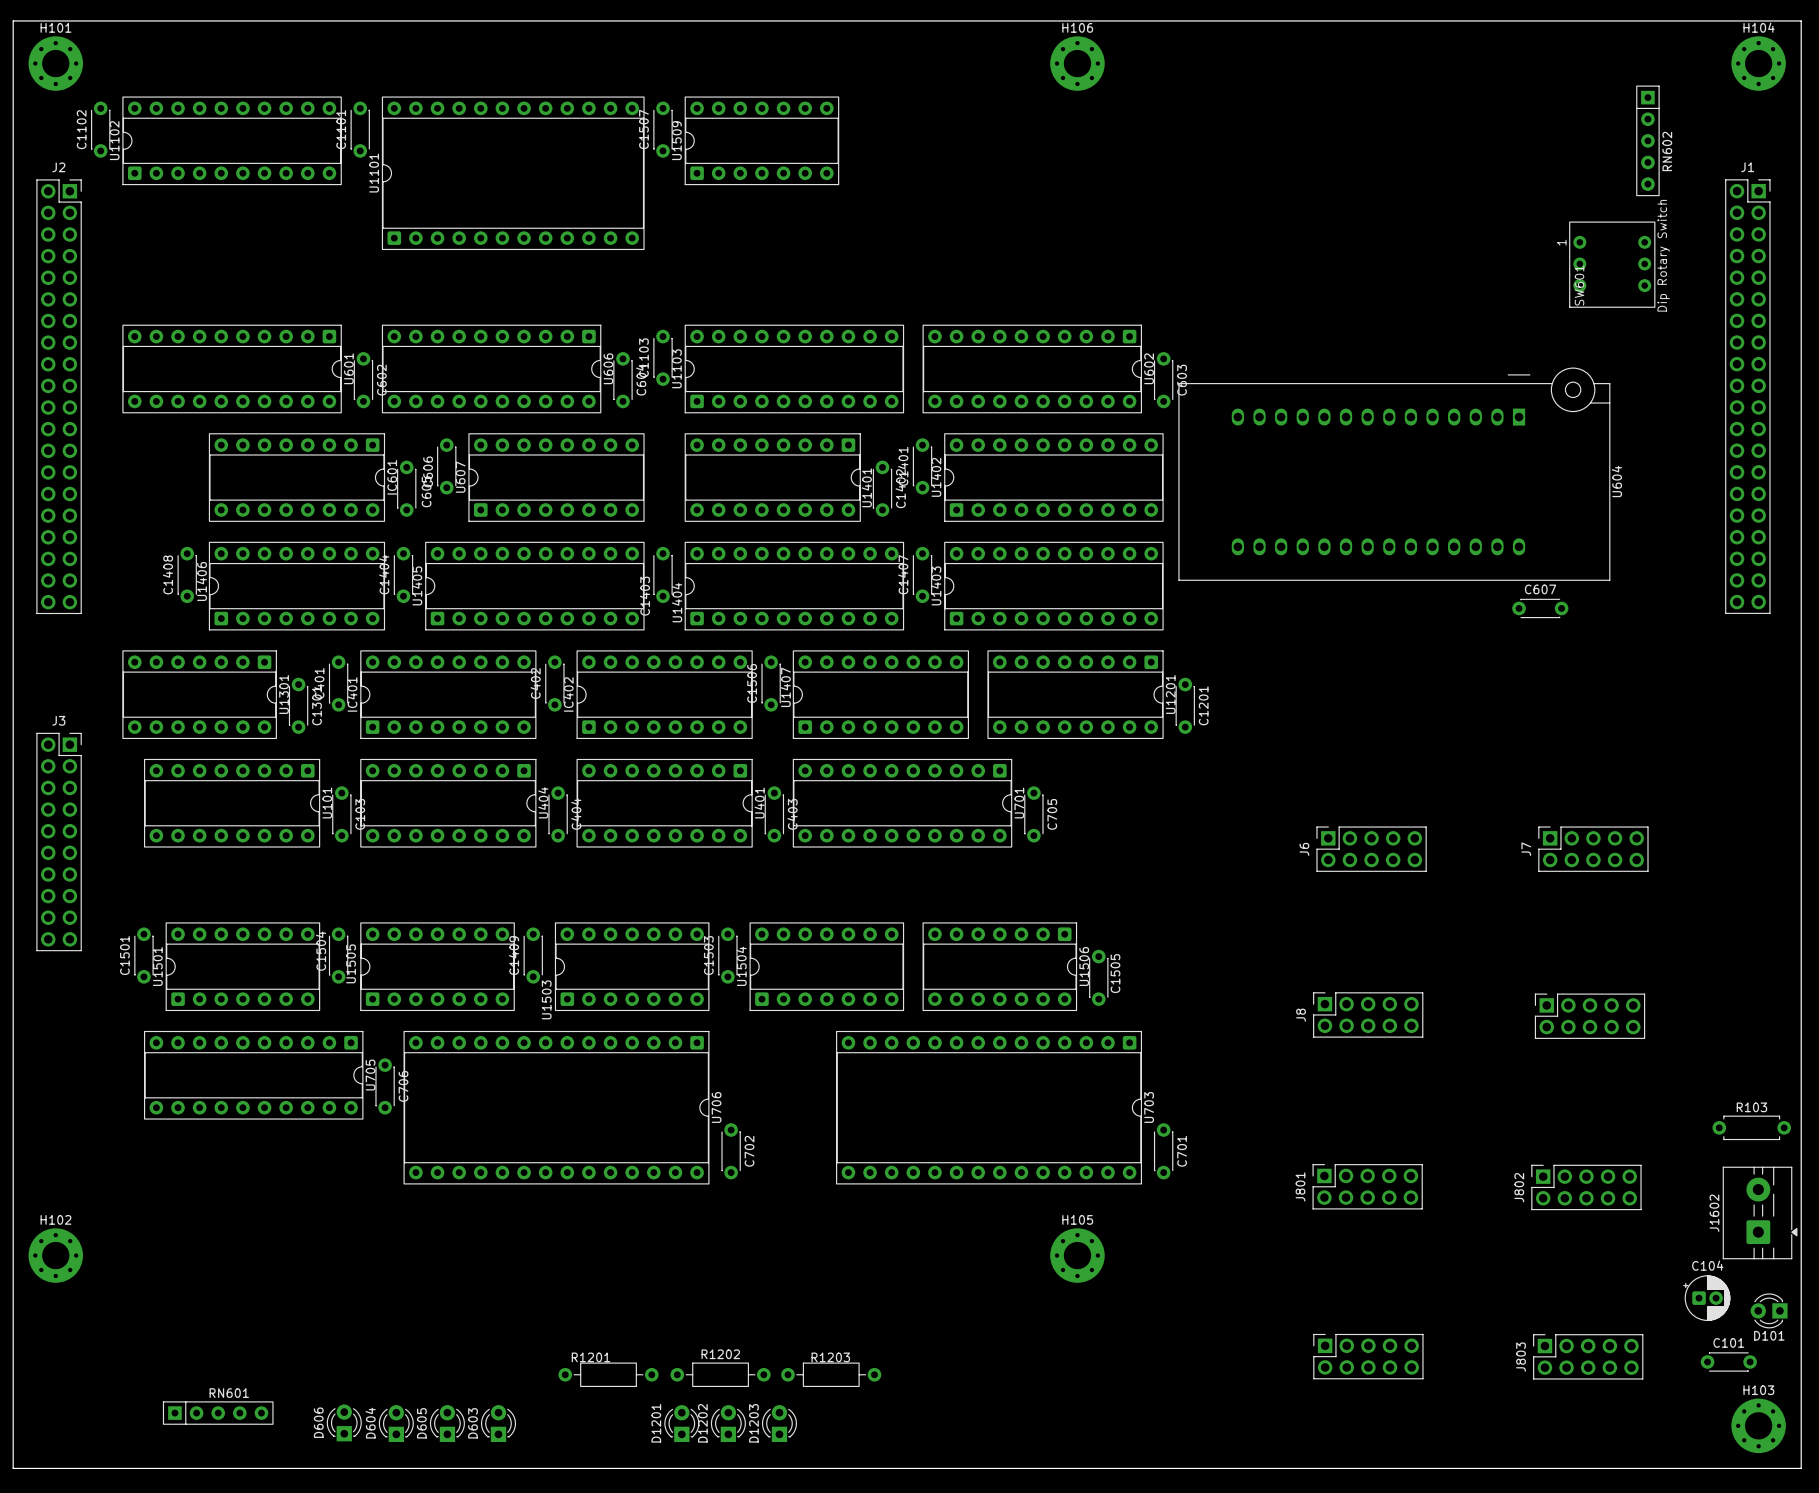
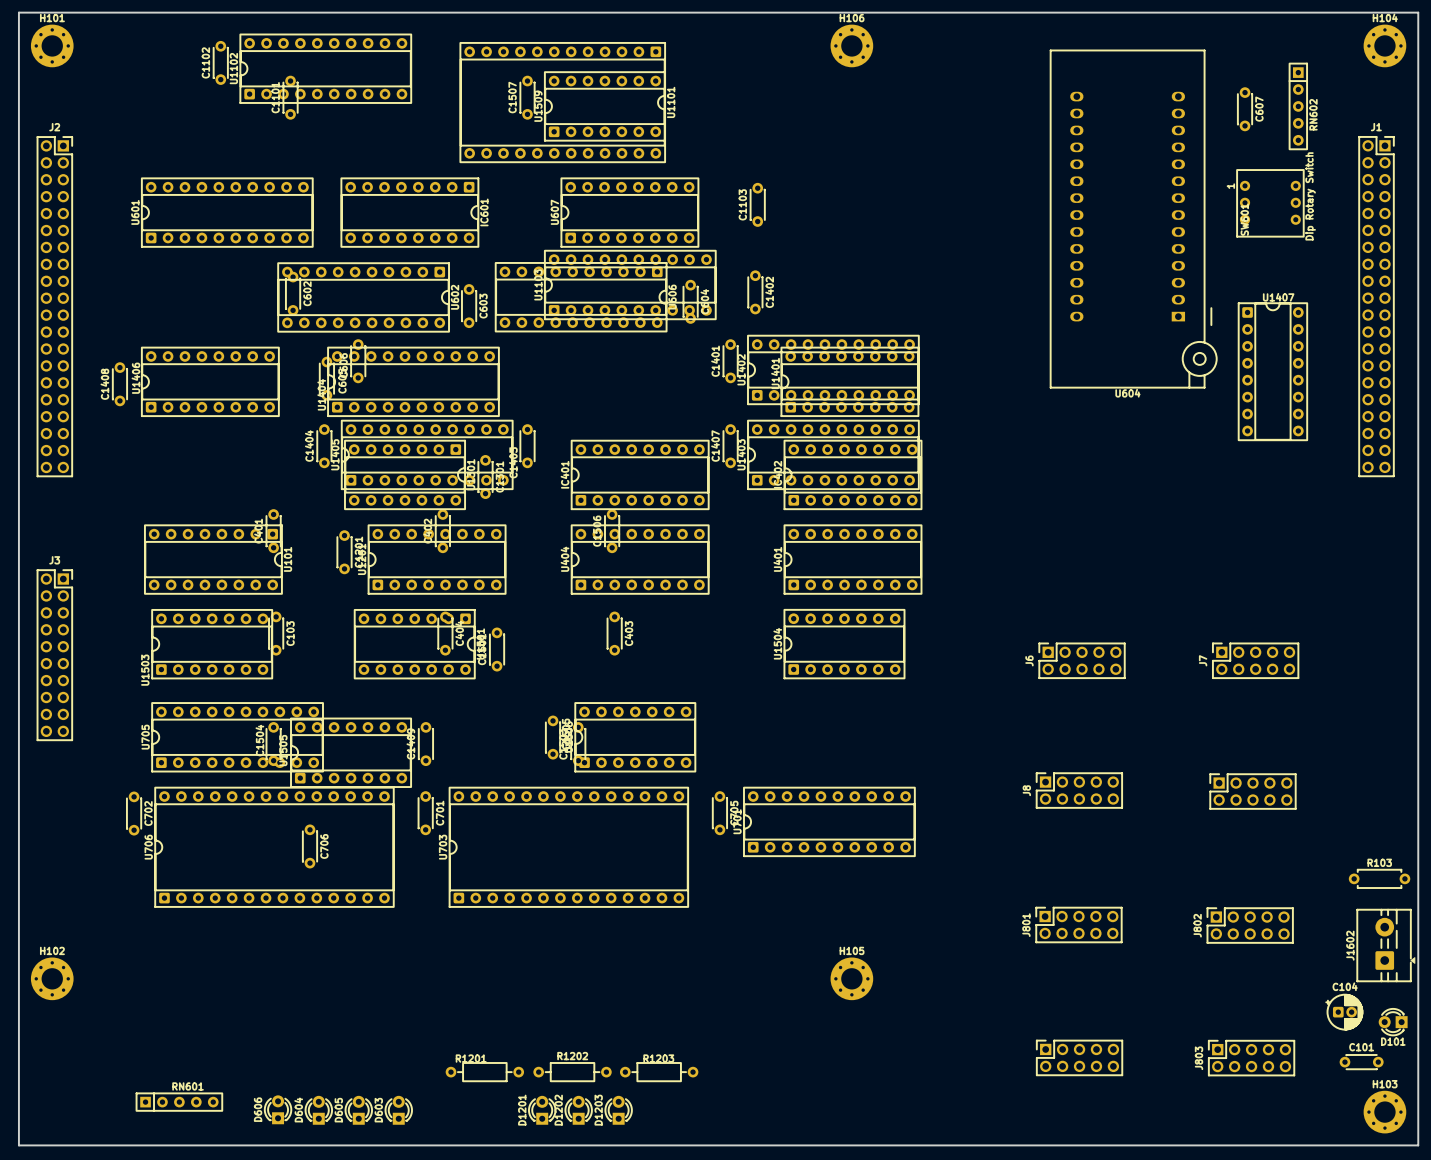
C1102 position: (100, 129) -> (220, 62)
U1102 position: (232, 140) -> (325, 68)
U1101 rotation: 0° (513, 173) -> 180° (562, 102)
U1101 position: (513, 173) -> (562, 102)
C1103 position: (663, 357) -> (757, 204)
U601 rotation: 0° (232, 369) -> 180° (227, 212)
U606 position: (491, 369) -> (581, 297)
U602 position: (1032, 369) -> (363, 297)
C604 position: (622, 380) -> (690, 301)
C603 position: (1163, 380) -> (469, 306)
U604 rotation: 0° (1394, 474) -> 90° clockwise (1133, 219)
IC601 position: (296, 477) -> (409, 212)
U607 position: (556, 477) -> (629, 212)
U1401 rotation: 0° (772, 477) -> 180° (849, 381)
U1401 position: (772, 477) -> (849, 381)
C1402 position: (882, 488) -> (755, 292)
C1408 position: (187, 574) -> (119, 384)
U1406 position: (296, 586) -> (210, 381)
U1404 position: (794, 586) -> (413, 381)
C607 rotation: 0° (1540, 608) -> 90° clockwise (1245, 109)
C607 position: (1540, 608) -> (1245, 109)
U1301 position: (199, 694) -> (405, 474)
IC401 position: (448, 694) -> (640, 474)
IC402 position: (664, 694) -> (853, 474)
U1407 rotation: 0° (880, 694) -> 90° clockwise (1272, 371)
U1407 position: (880, 694) -> (1272, 371)
U1201 rotation: 0° (1075, 694) -> 180° (437, 559)
U1201 position: (1075, 694) -> (437, 559)
C1301 position: (298, 705) -> (485, 477)
C1201 position: (1185, 705) -> (344, 552)
U101 position: (232, 803) -> (213, 559)
U404 rotation: 0° (448, 803) -> 180° (640, 559)
U404 position: (448, 803) -> (640, 559)
U401 rotation: 0° (664, 803) -> 180° (853, 559)
U401 position: (664, 803) -> (853, 559)
U701 rotation: 0° (902, 803) -> 180° (829, 821)
U701 position: (902, 803) -> (829, 821)
C705 position: (1033, 814) -> (719, 813)
C1501 position: (143, 955) -> (497, 649)
U1501 rotation: 0° (242, 966) -> 180° (414, 644)
U1501 position: (242, 966) -> (414, 644)
U1503 position: (632, 966) -> (212, 644)
U1504 position: (826, 966) -> (844, 644)
U1506 rotation: 0° (999, 966) -> 180° (635, 737)
U1506 position: (999, 966) -> (635, 737)
C1505 position: (1098, 977) -> (553, 737)
U705 rotation: 0° (253, 1075) -> 180° (237, 737)
U705 position: (253, 1075) -> (237, 737)
U706 rotation: 0° (556, 1107) -> 180° (274, 847)
U706 position: (556, 1107) -> (274, 847)
U703 rotation: 0° (989, 1107) -> 180° (568, 847)
U703 position: (989, 1107) -> (568, 847)
C702 position: (731, 1151) -> (134, 813)
C701 position: (1163, 1151) -> (425, 813)

